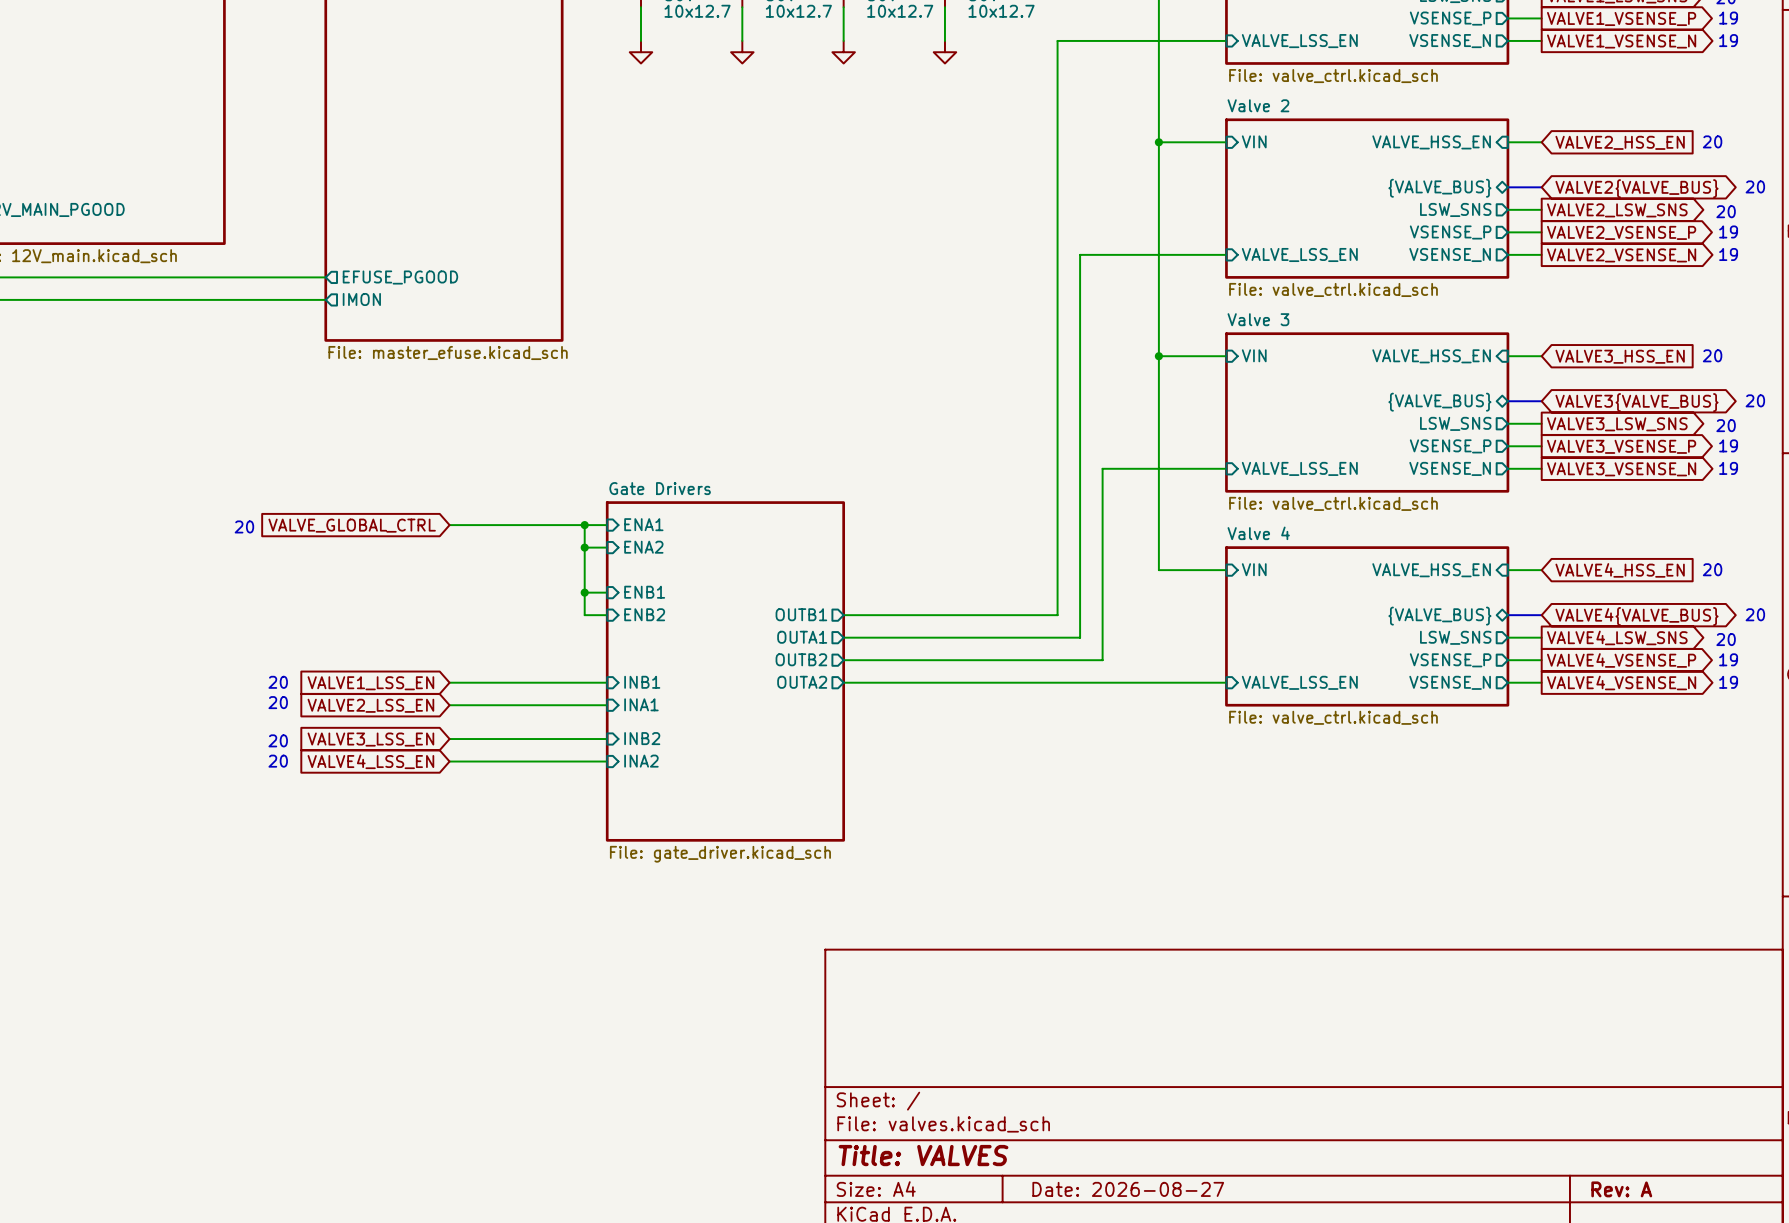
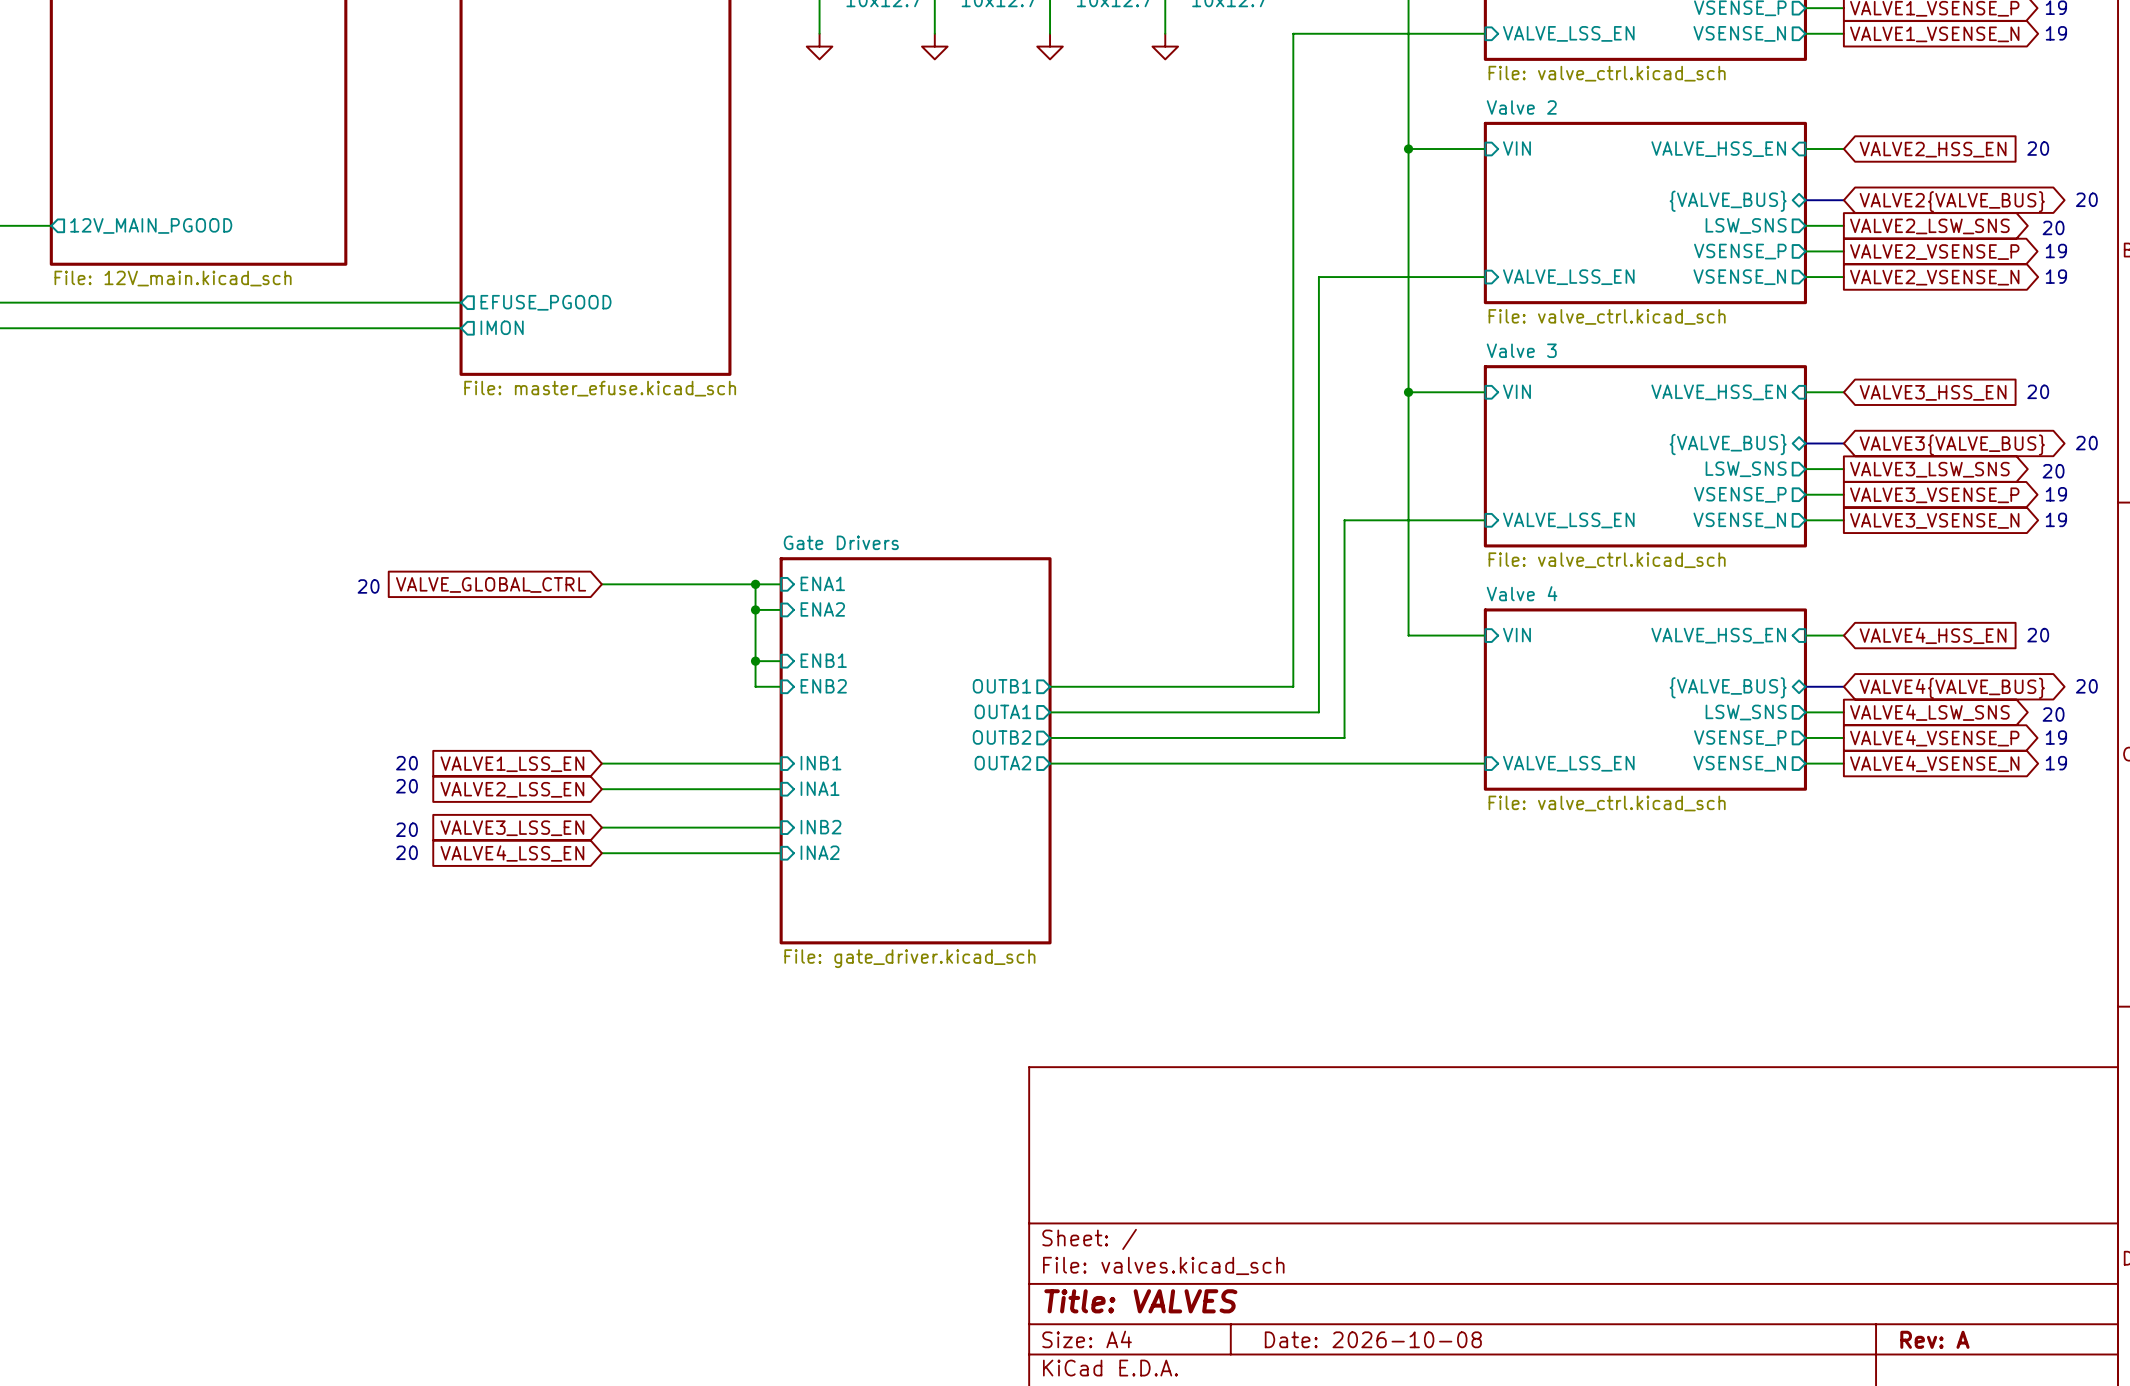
title block: Date: 2026-08-27 (1128, 1189) -> Date: 2026-10-08 (1373, 1339)

